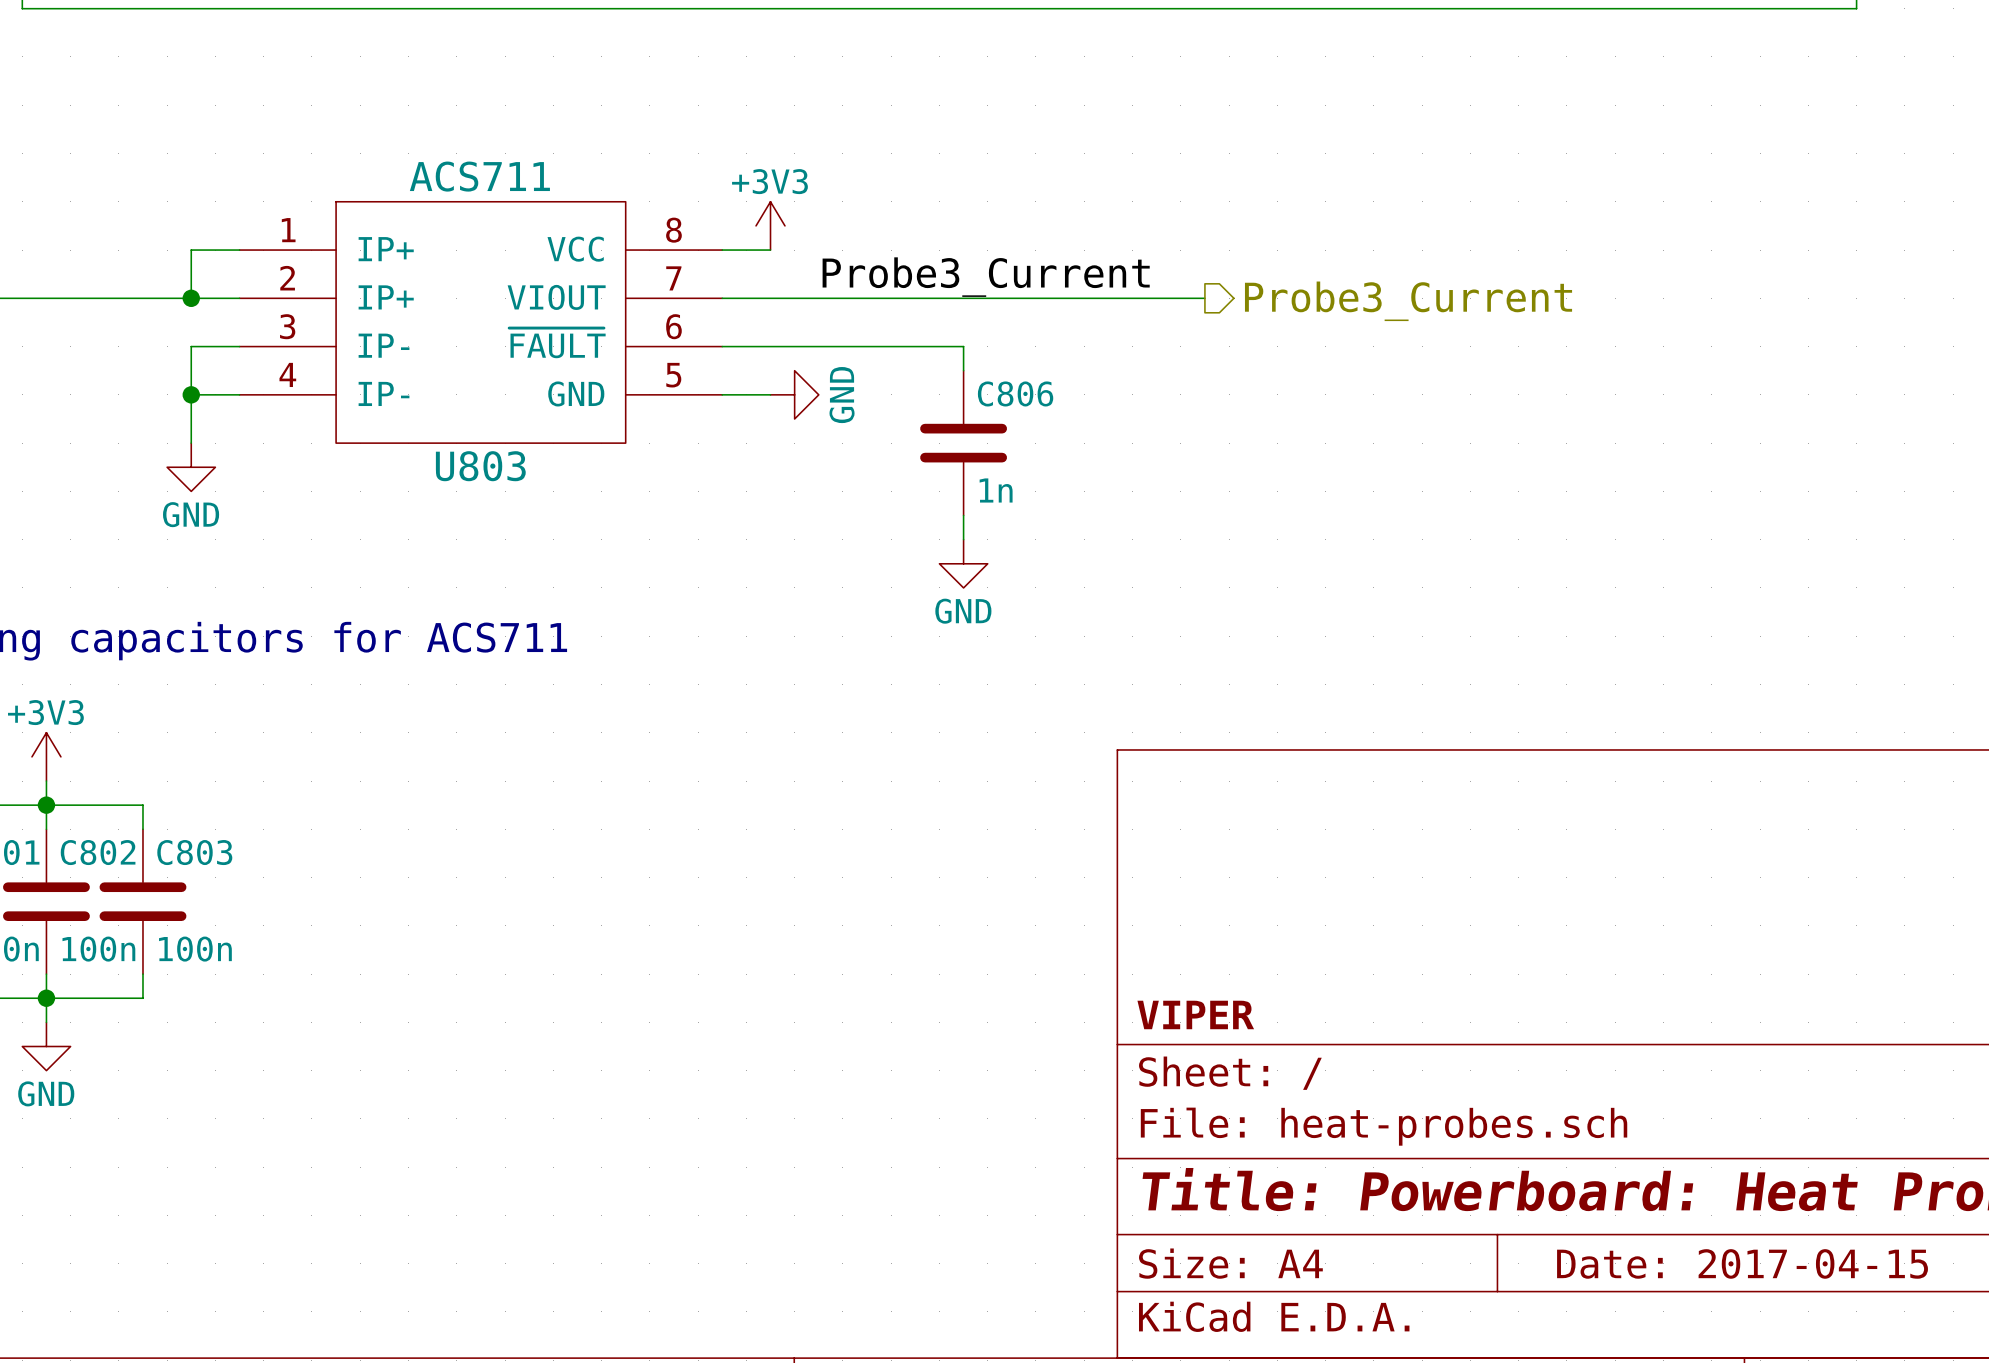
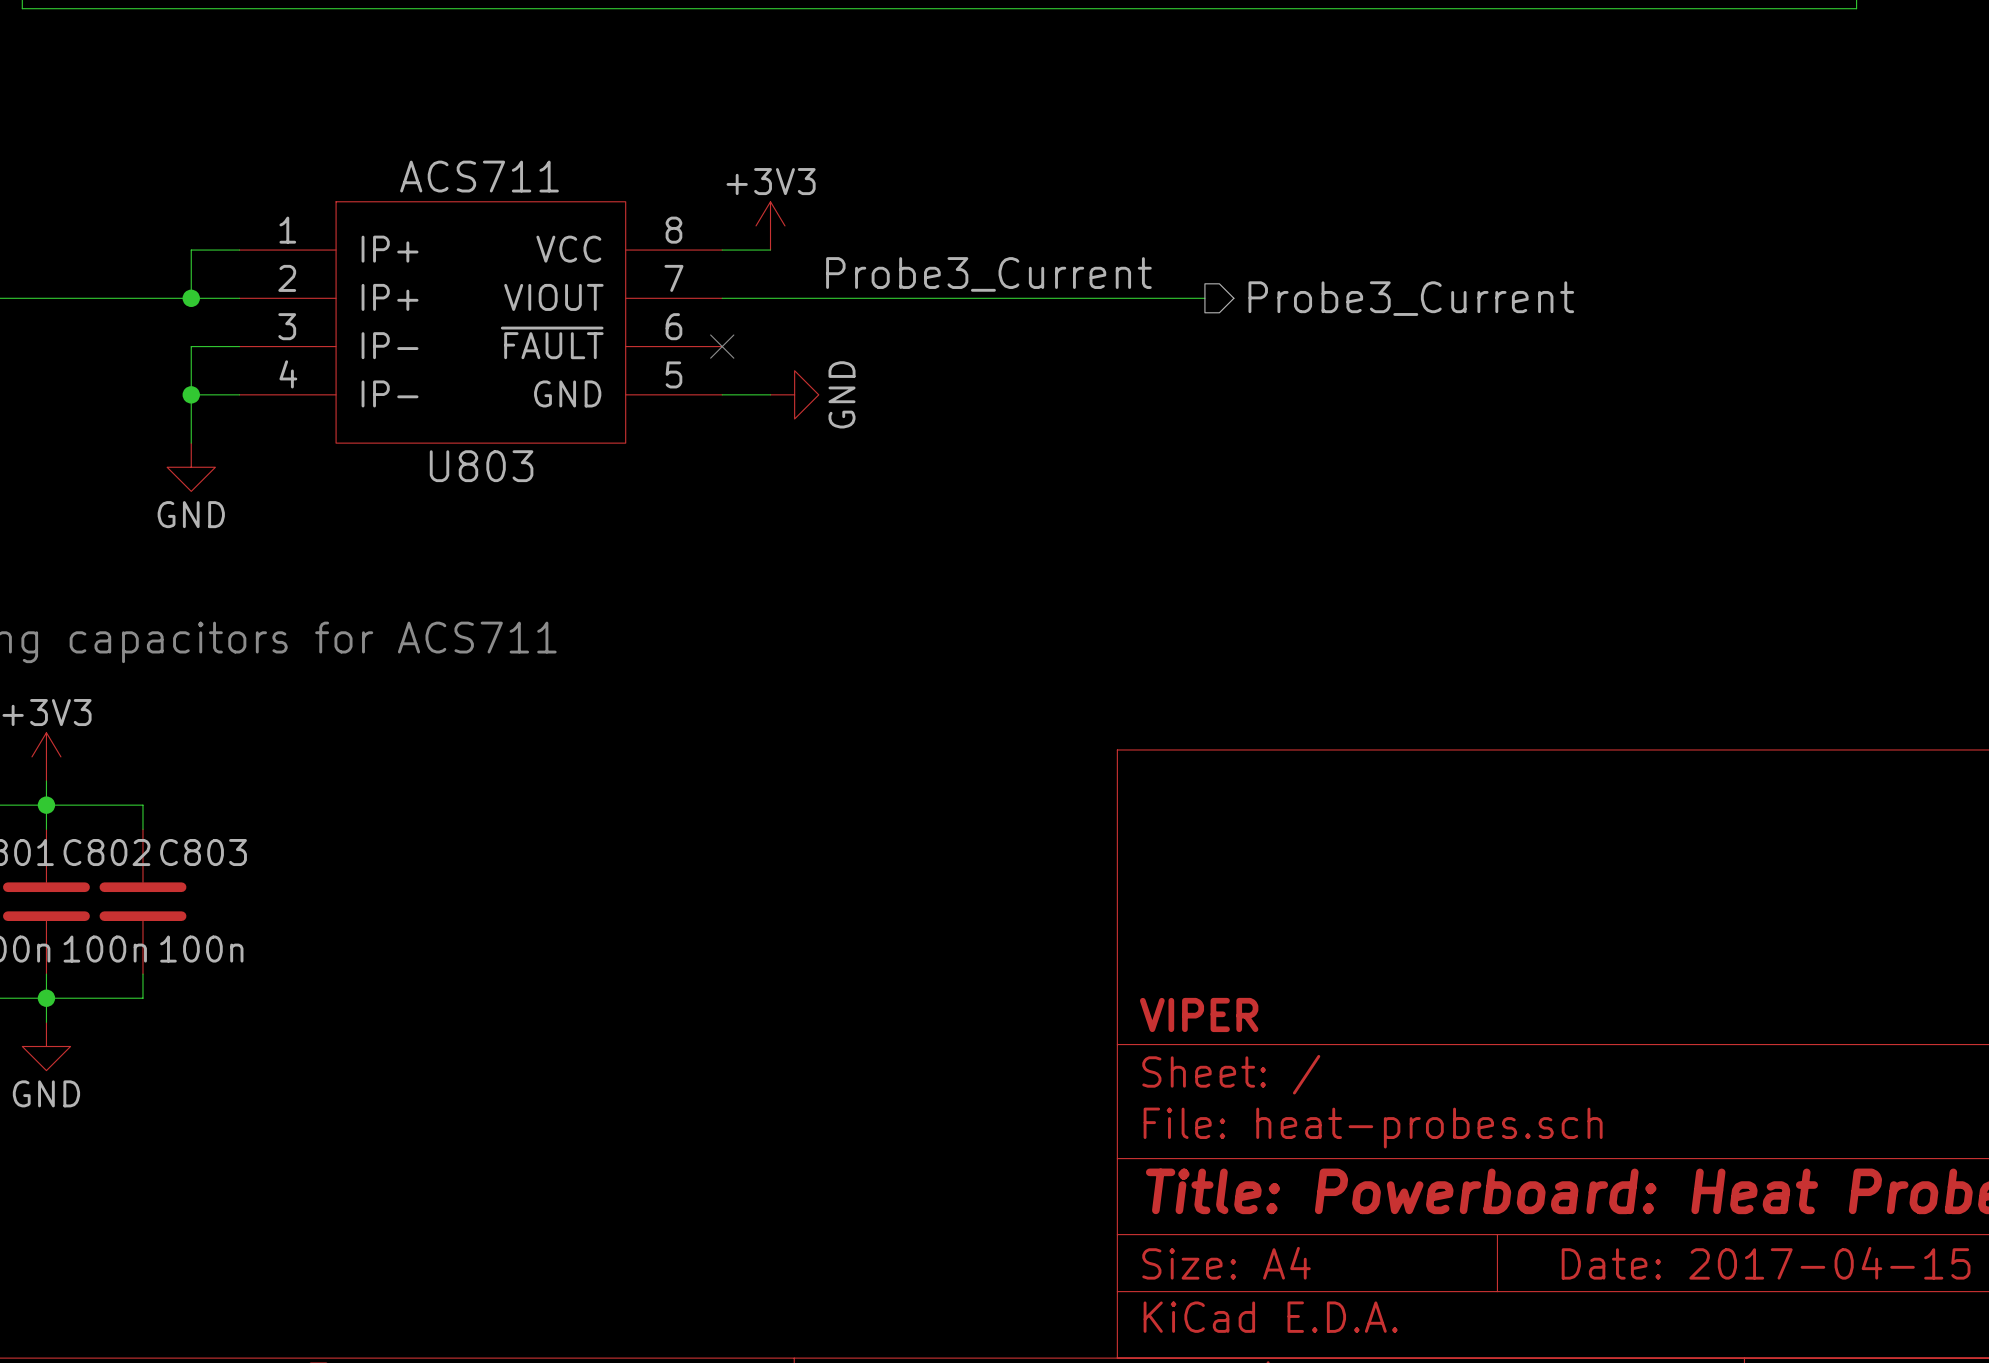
wire: (722, 346) (963, 346) (963, 370) -> none
no-connect mark: none -> (722, 346)
C806: 1n (963, 443) -> none
wire: (963, 515) (963, 539) -> none
power symbol: GND (963, 563) -> none

